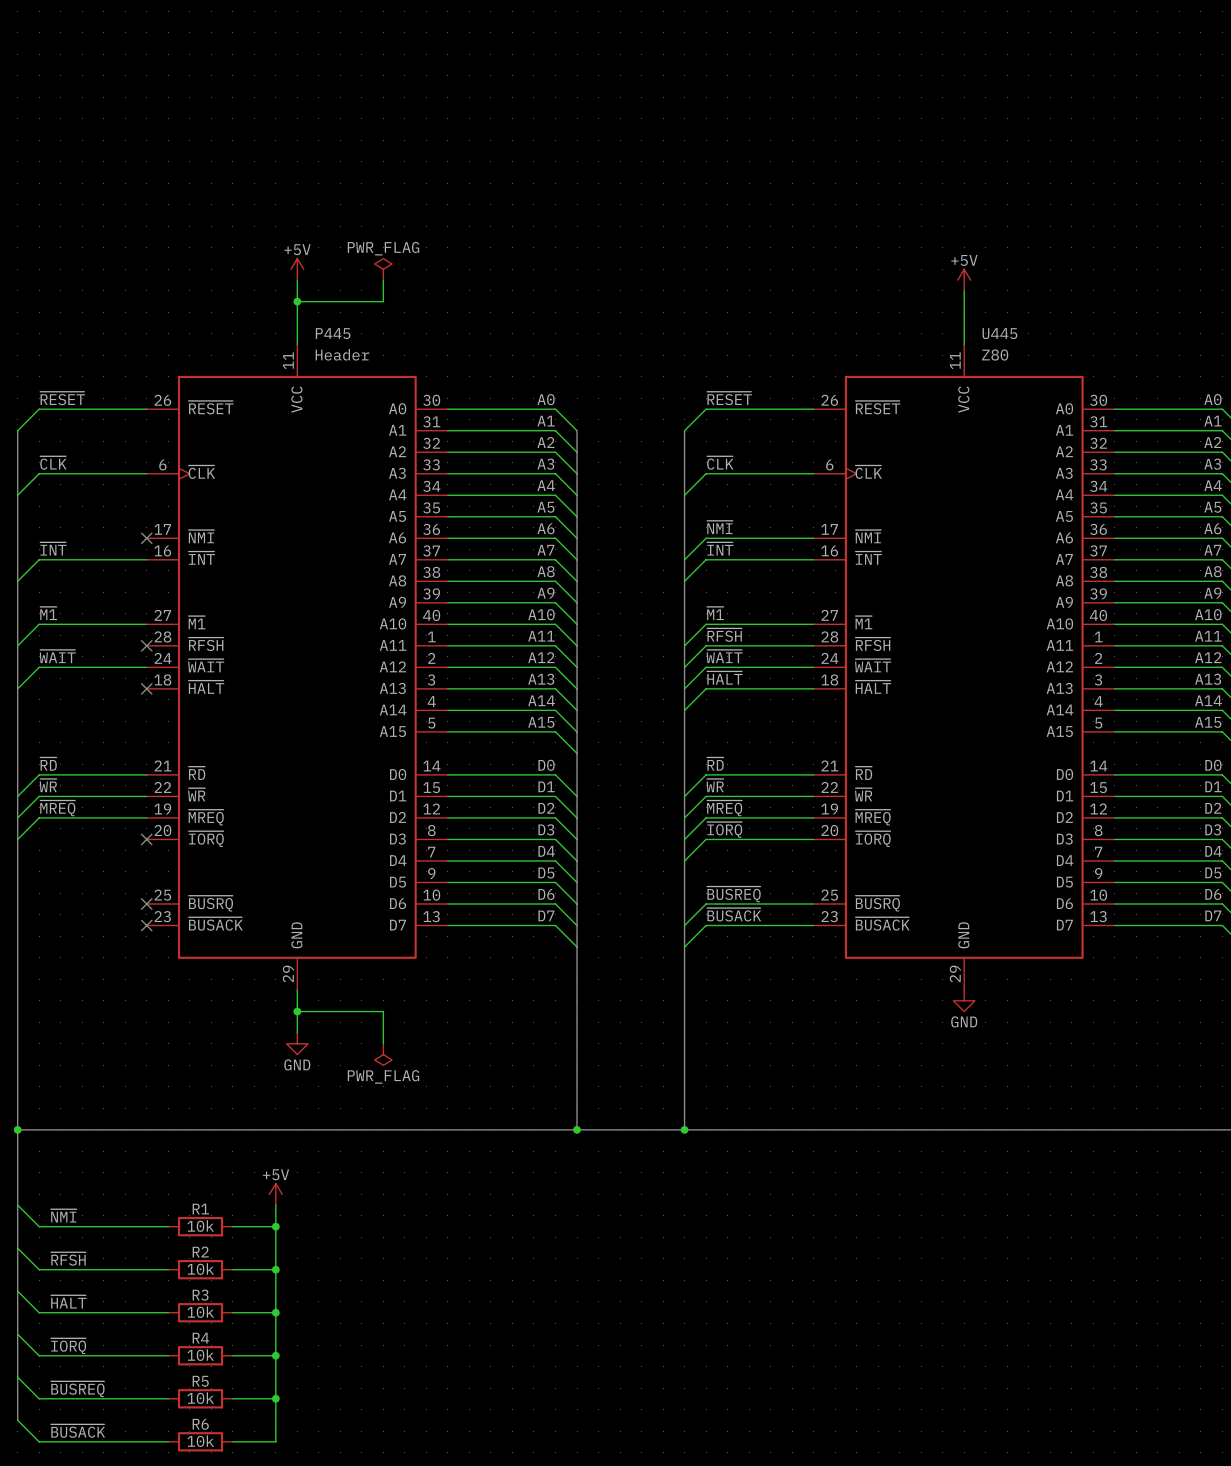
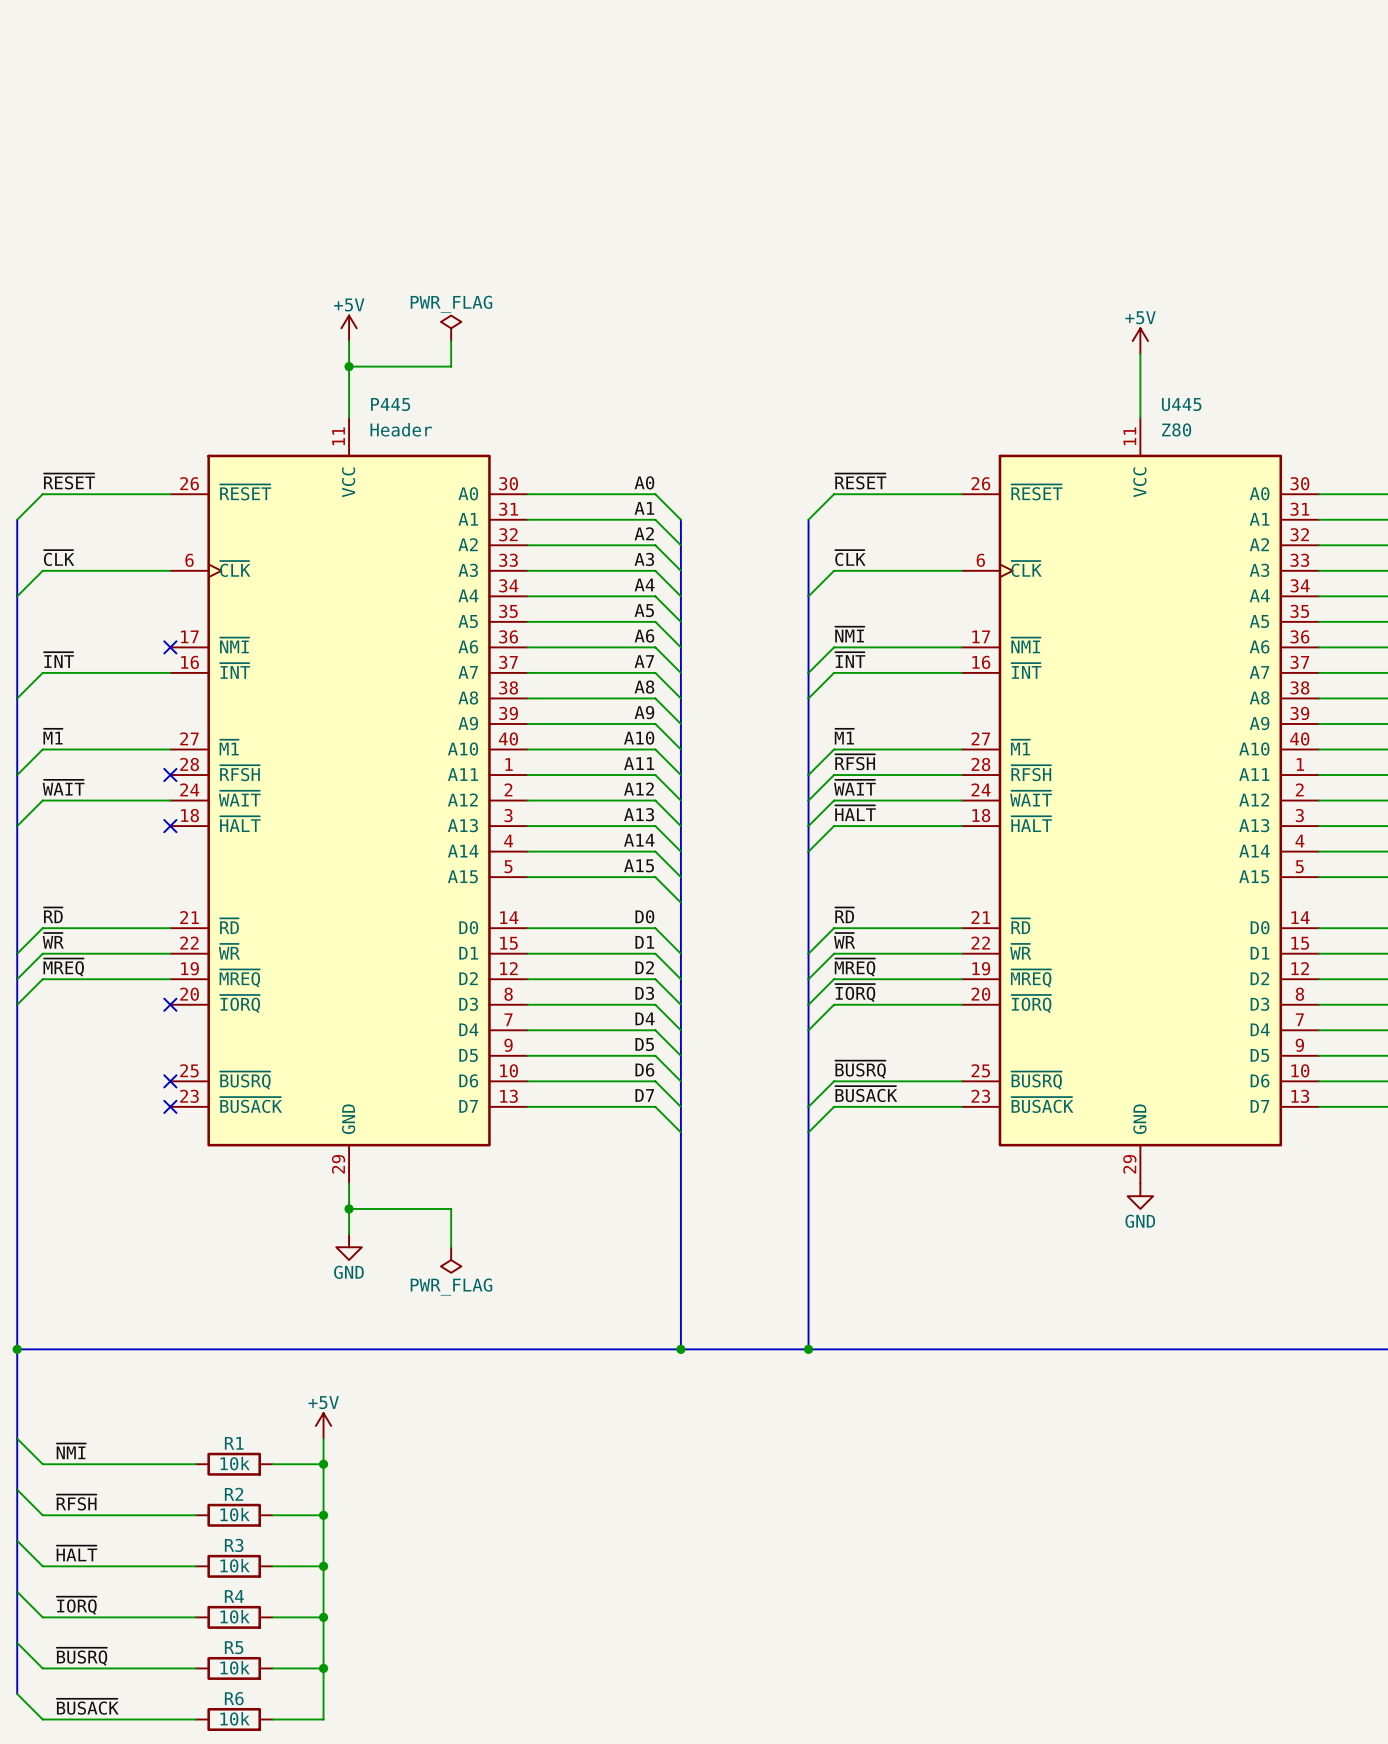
label: ~{BUSREQ} (733, 894) -> ~{BUSRQ} (860, 1069)
label: ~{BUSREQ} (77, 1389) -> ~{BUSRQ} (81, 1656)

